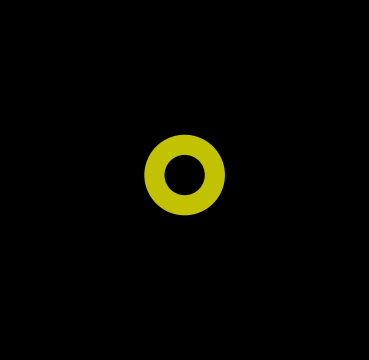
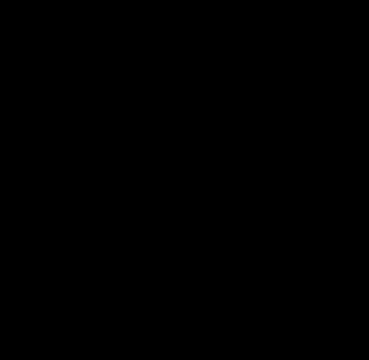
part: (184, 175) -> none

